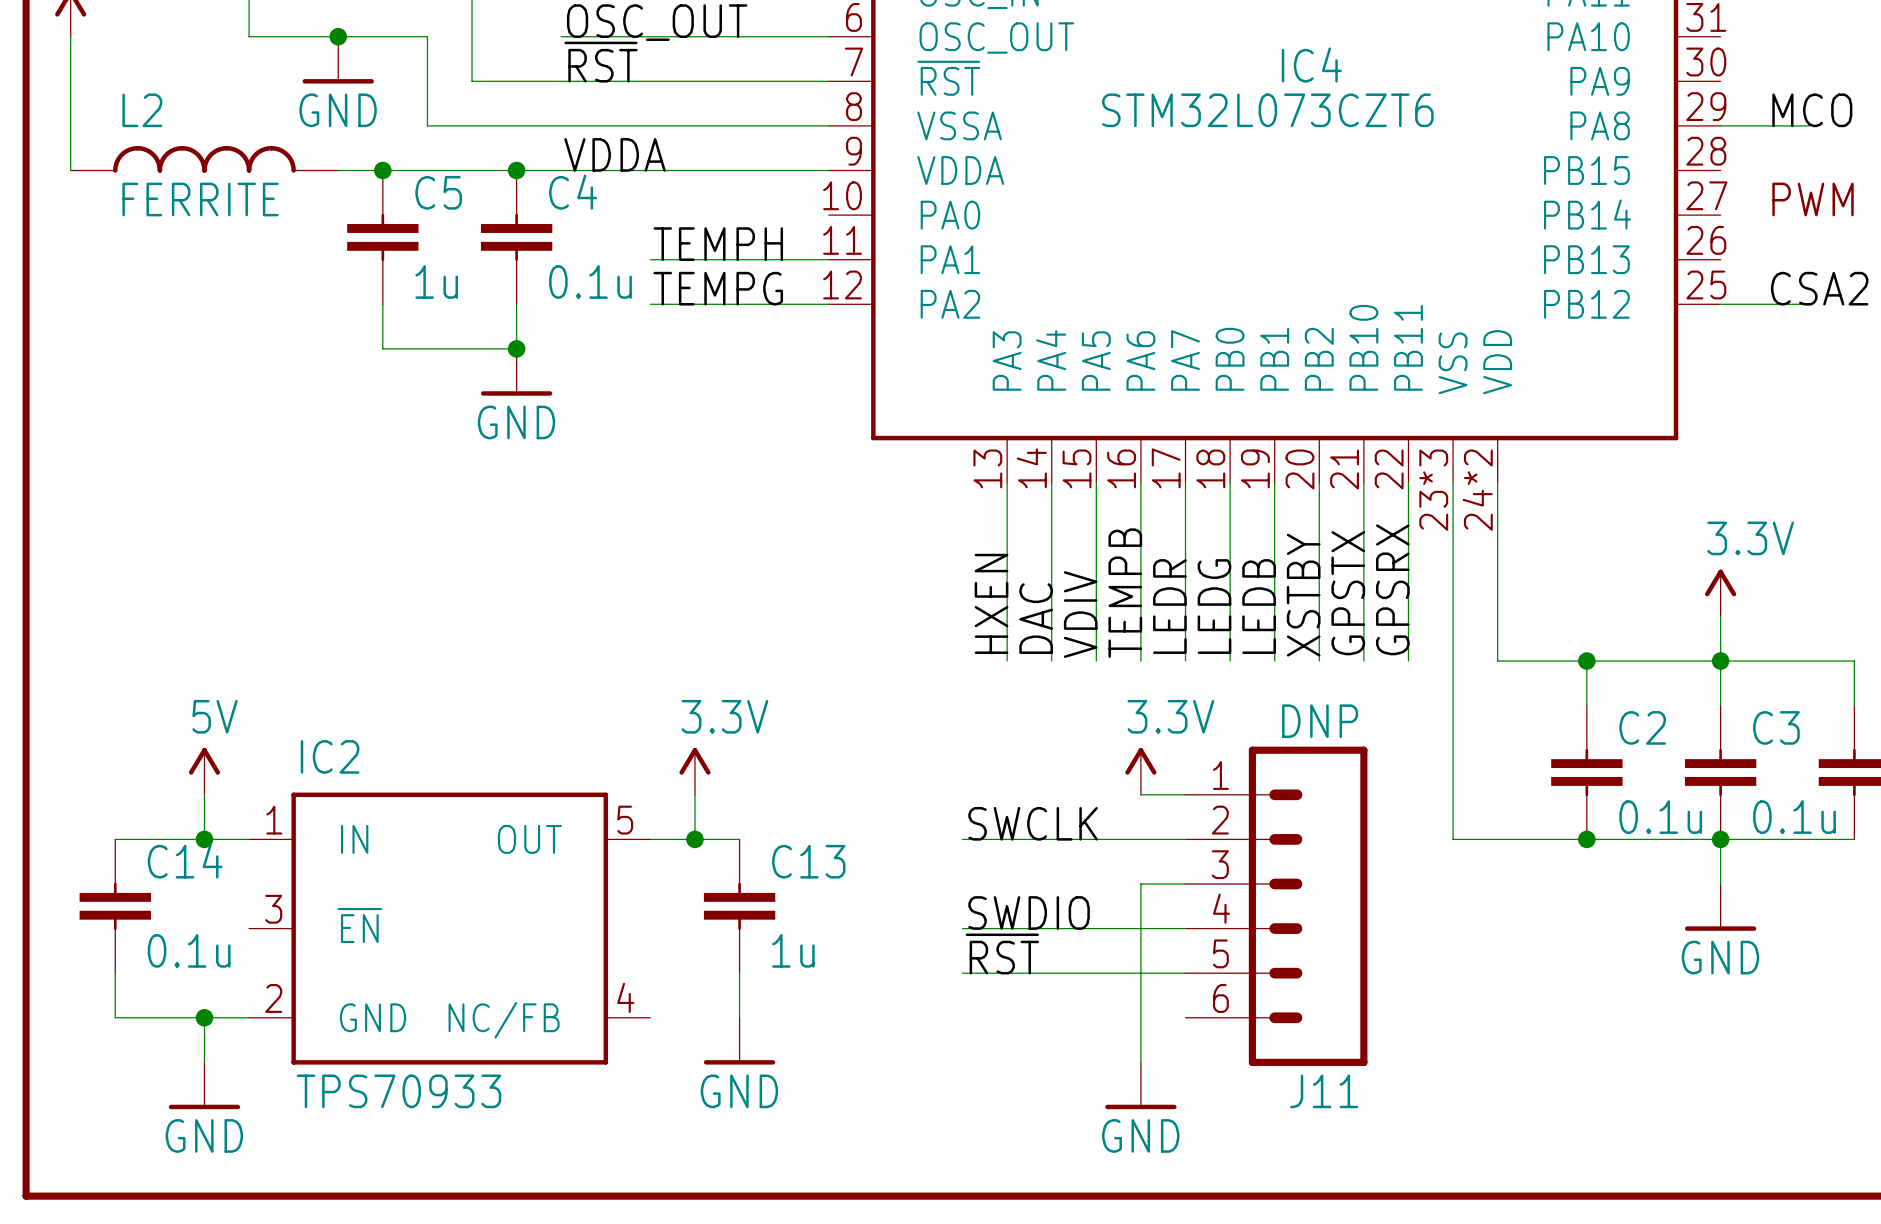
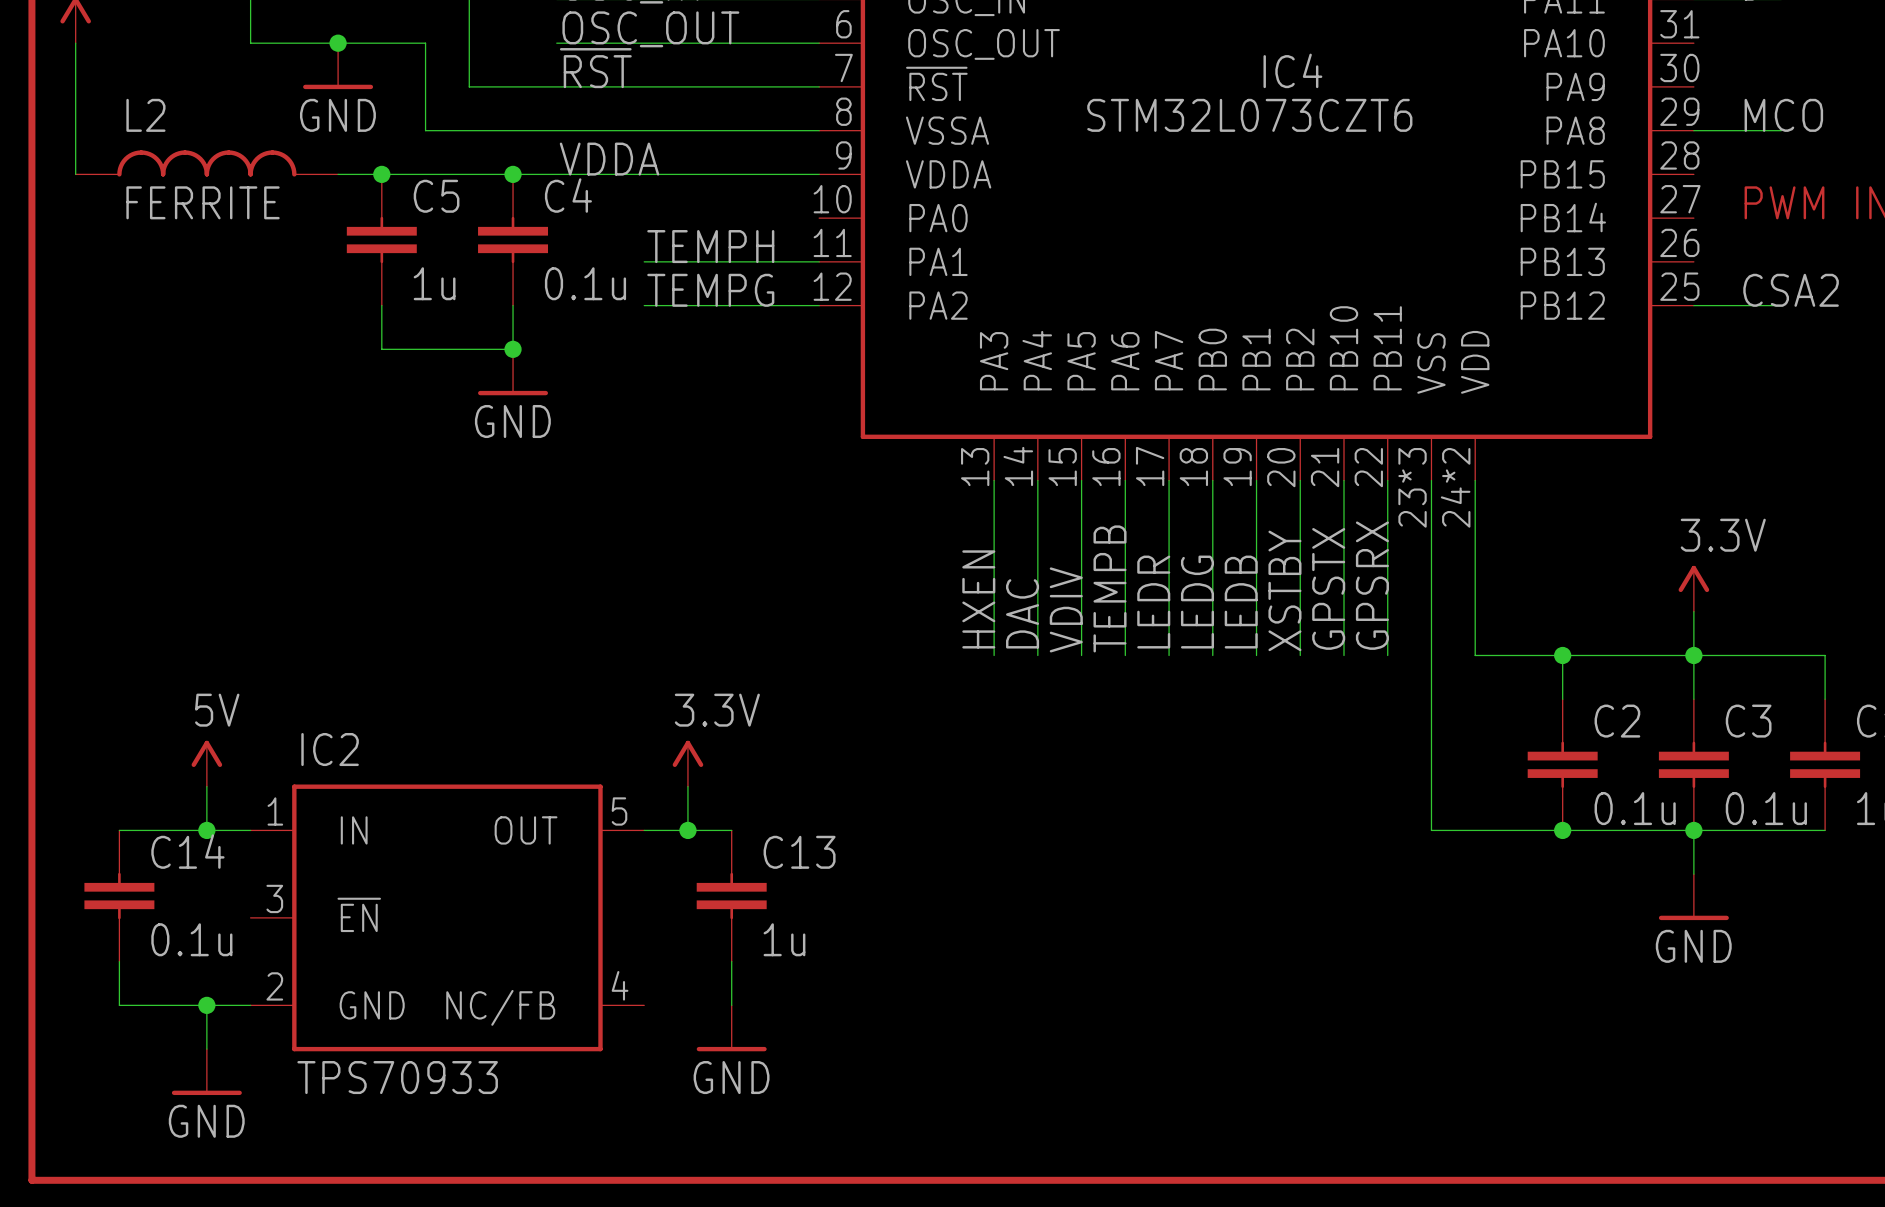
power symbol: 3.3V (1140, 771) -> none
wire: (1140, 794) (1185, 794) -> none
label: SWCLK (1033, 823) -> none
wire: (962, 839) (1185, 839) -> none
wire: (1185, 883) (1140, 883) (1140, 1062) -> none
J11: DNP (1276, 906) -> none
label: SWDIO (1029, 912) -> none
wire: (962, 928) (1185, 928) -> none
label: ~{RST} (1002, 953) -> none
wire: (962, 973) (1185, 973) -> none
power symbol: GND (1140, 1085) -> none

